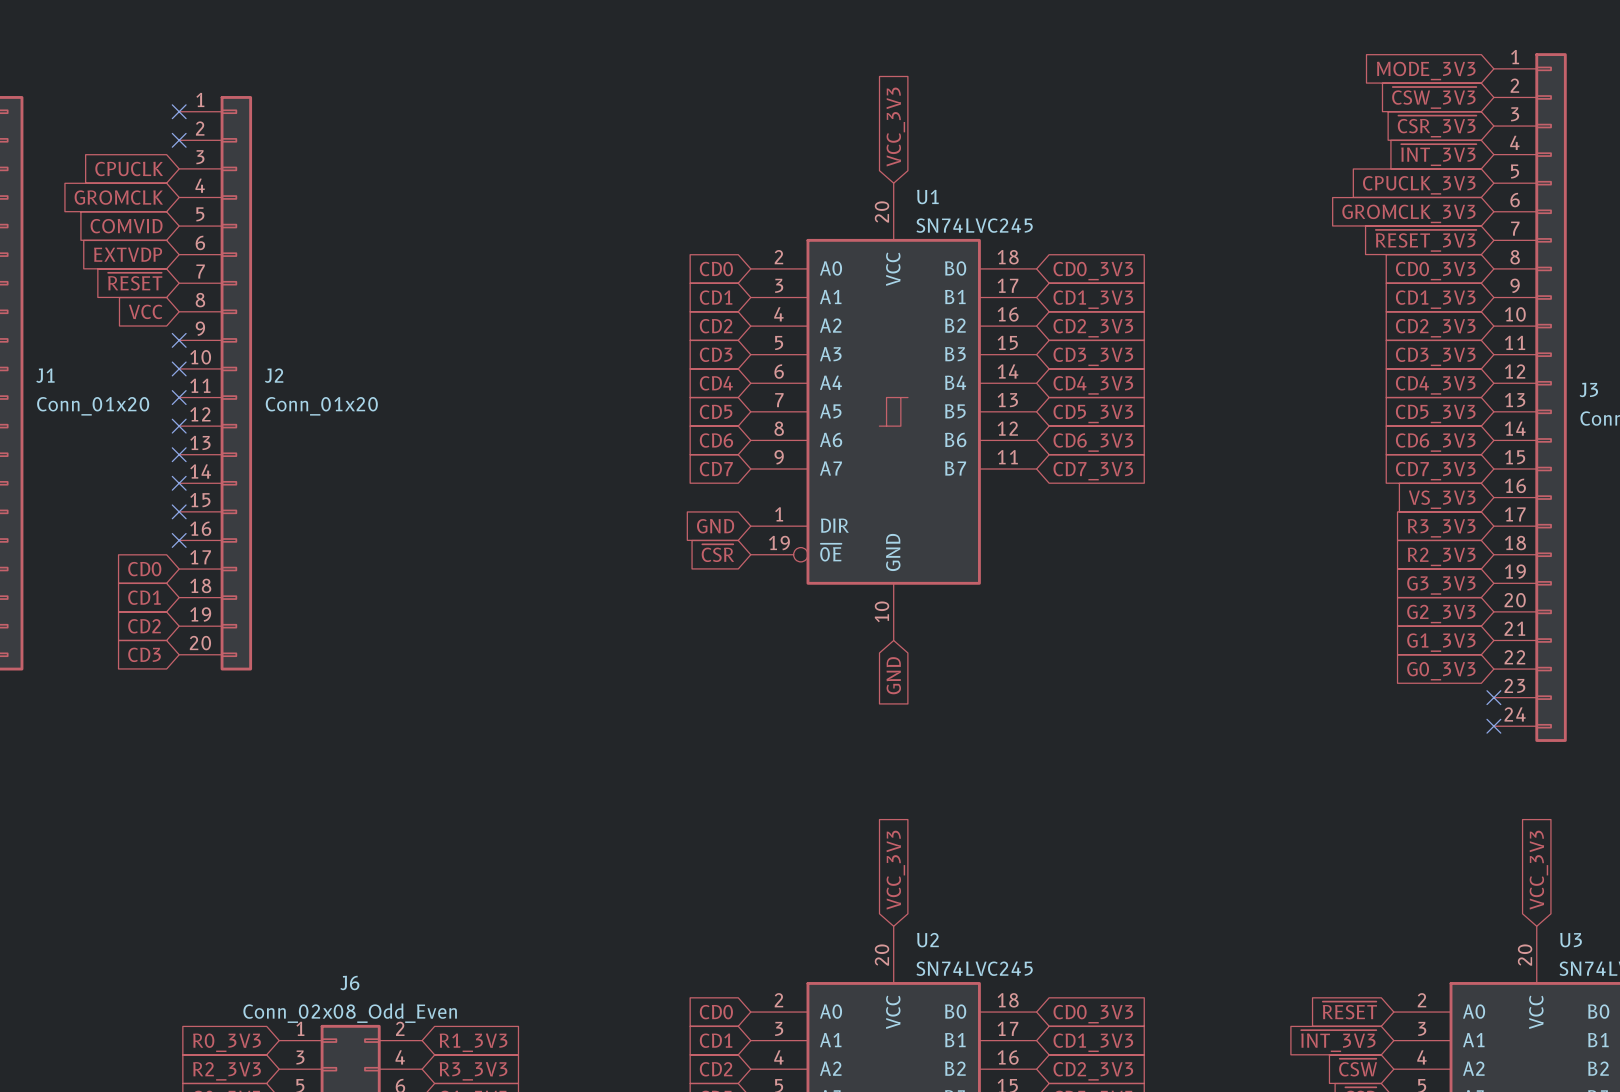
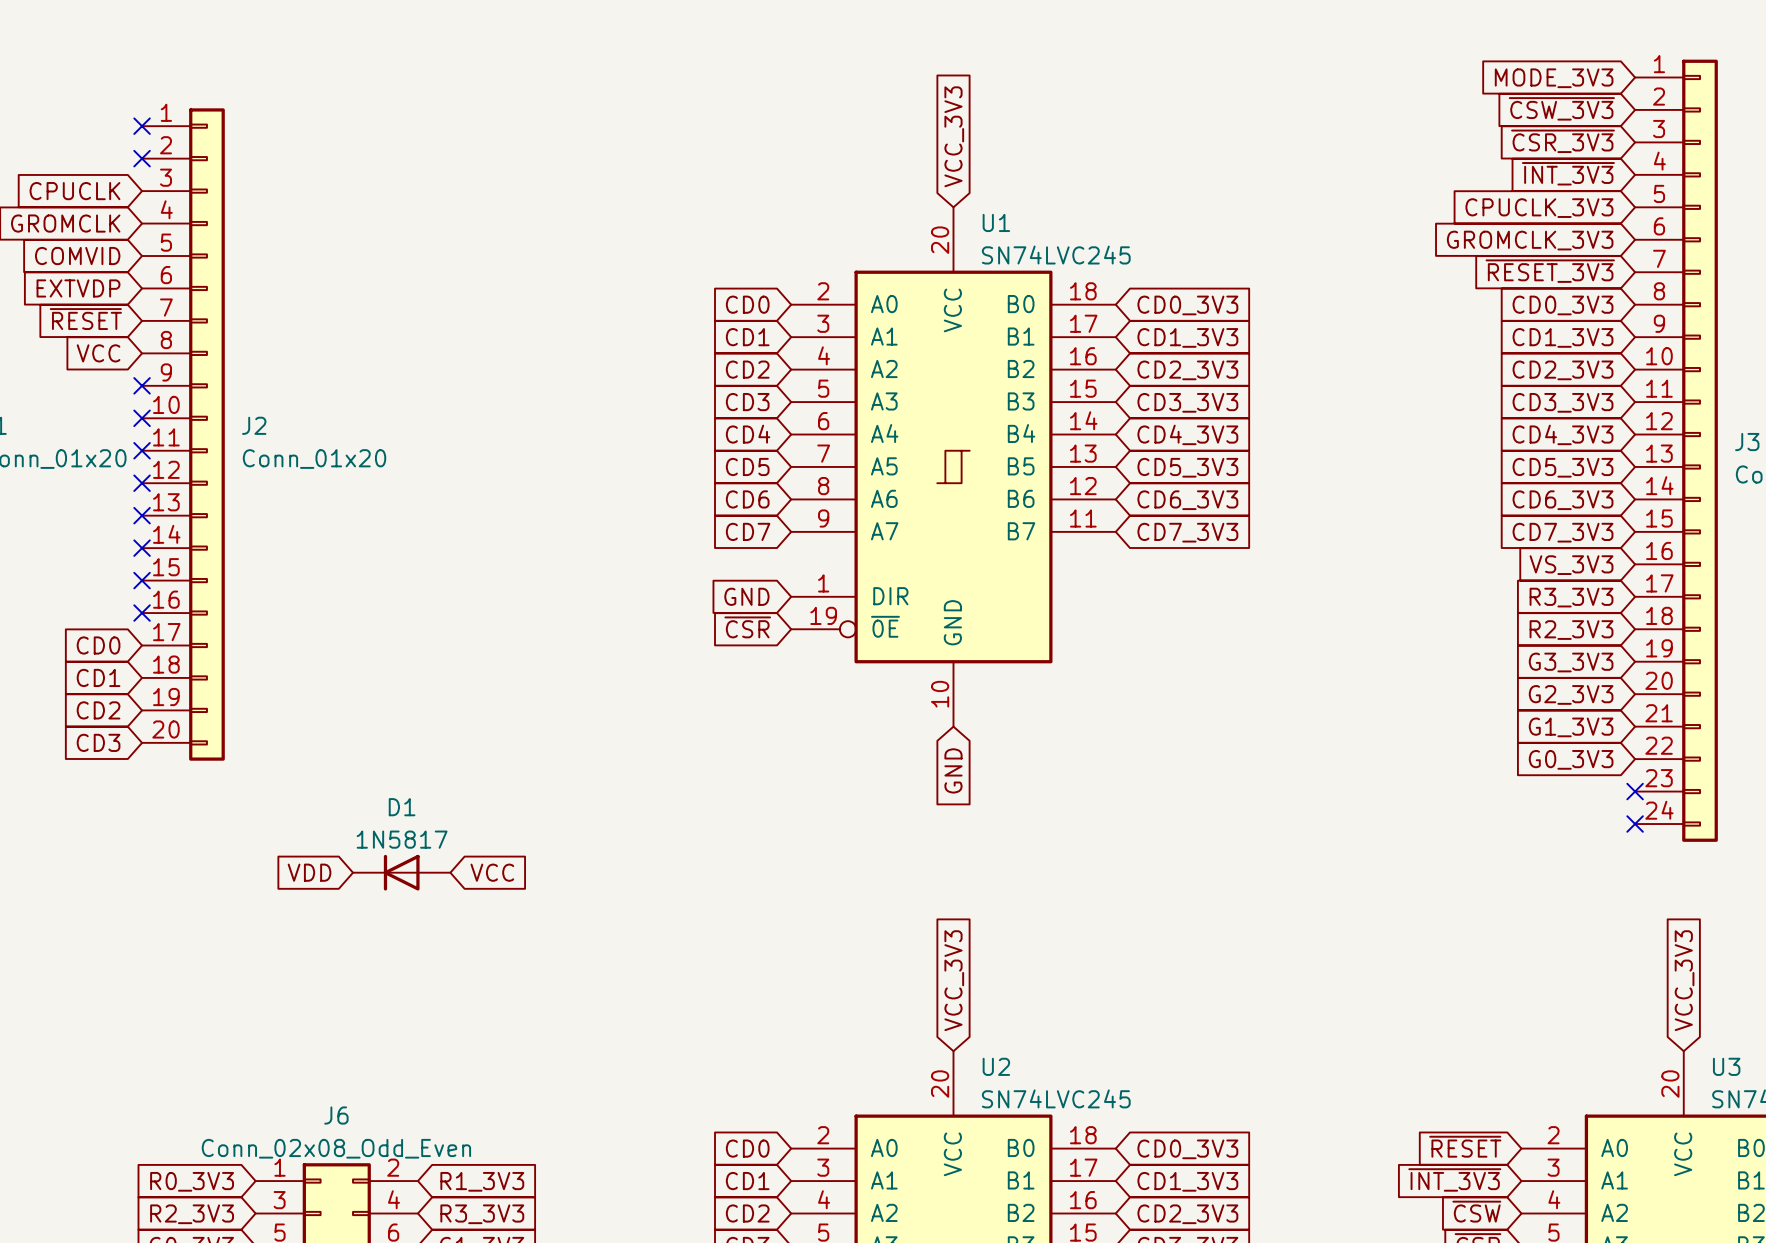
global label: none -> VDD (309, 872)
D1: none -> 1N5817 (401, 872)
global label: none -> VCC (492, 872)

